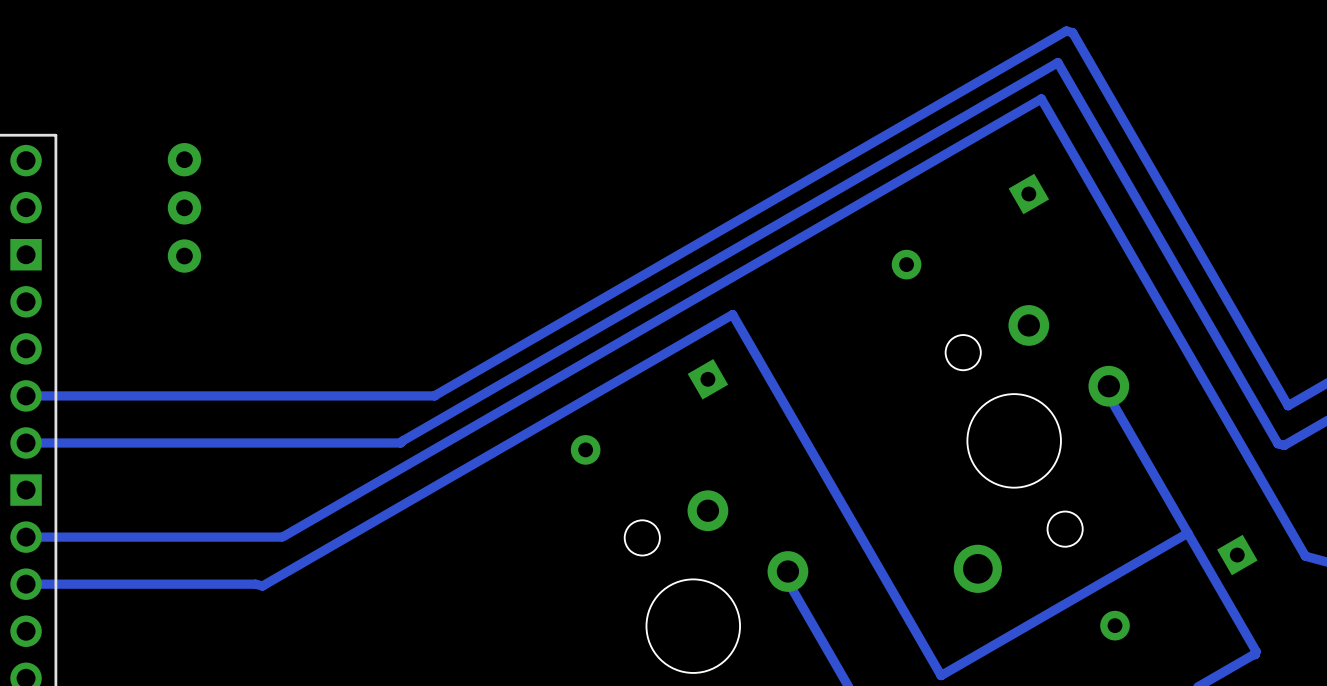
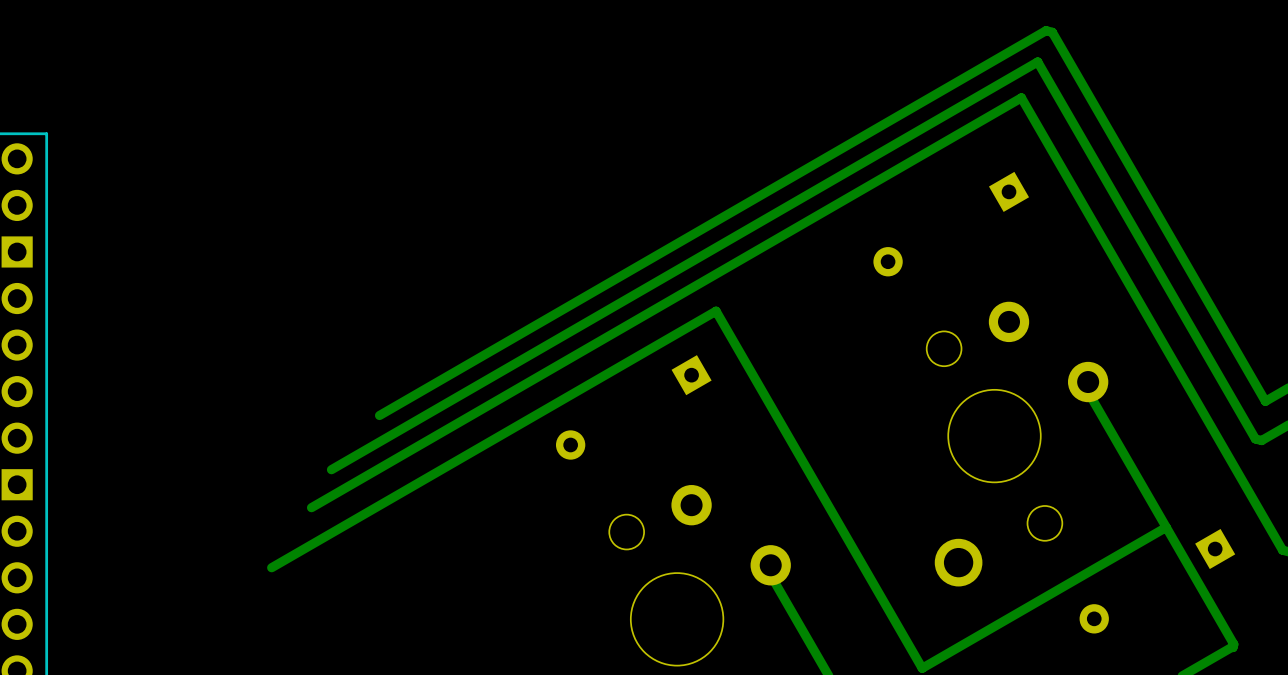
track: (1066, 31) (434, 395) (26, 395) -> (1046, 30) (379, 415)
track: (1057, 62) (400, 442) (26, 442) -> (1037, 61) (331, 469)
track: (1041, 98) (282, 536) -> (1021, 97) (311, 507)
part: (184, 159) -> none
part: (184, 207) -> none
part: (184, 256) -> none
track: (732, 314) (262, 586) (255, 584) (26, 584) -> (716, 311) (271, 567)
track: (281, 537) (26, 537) -> none

